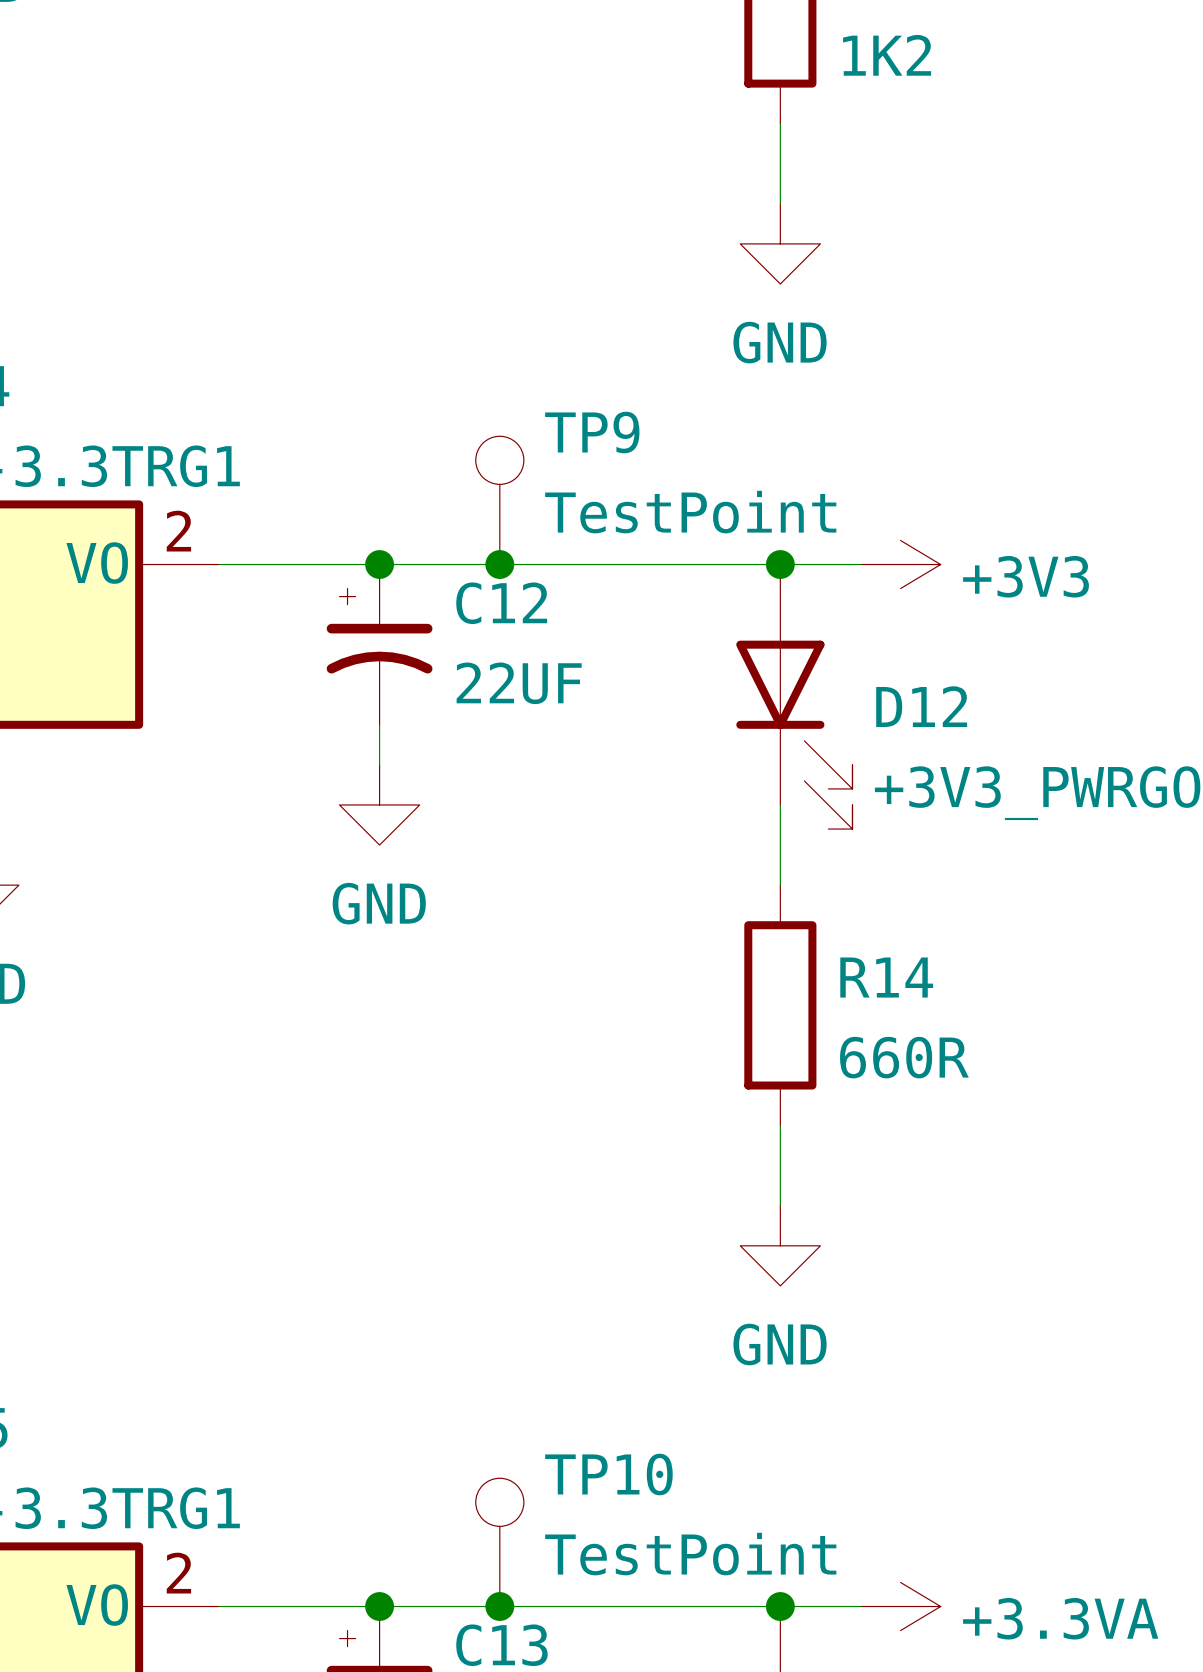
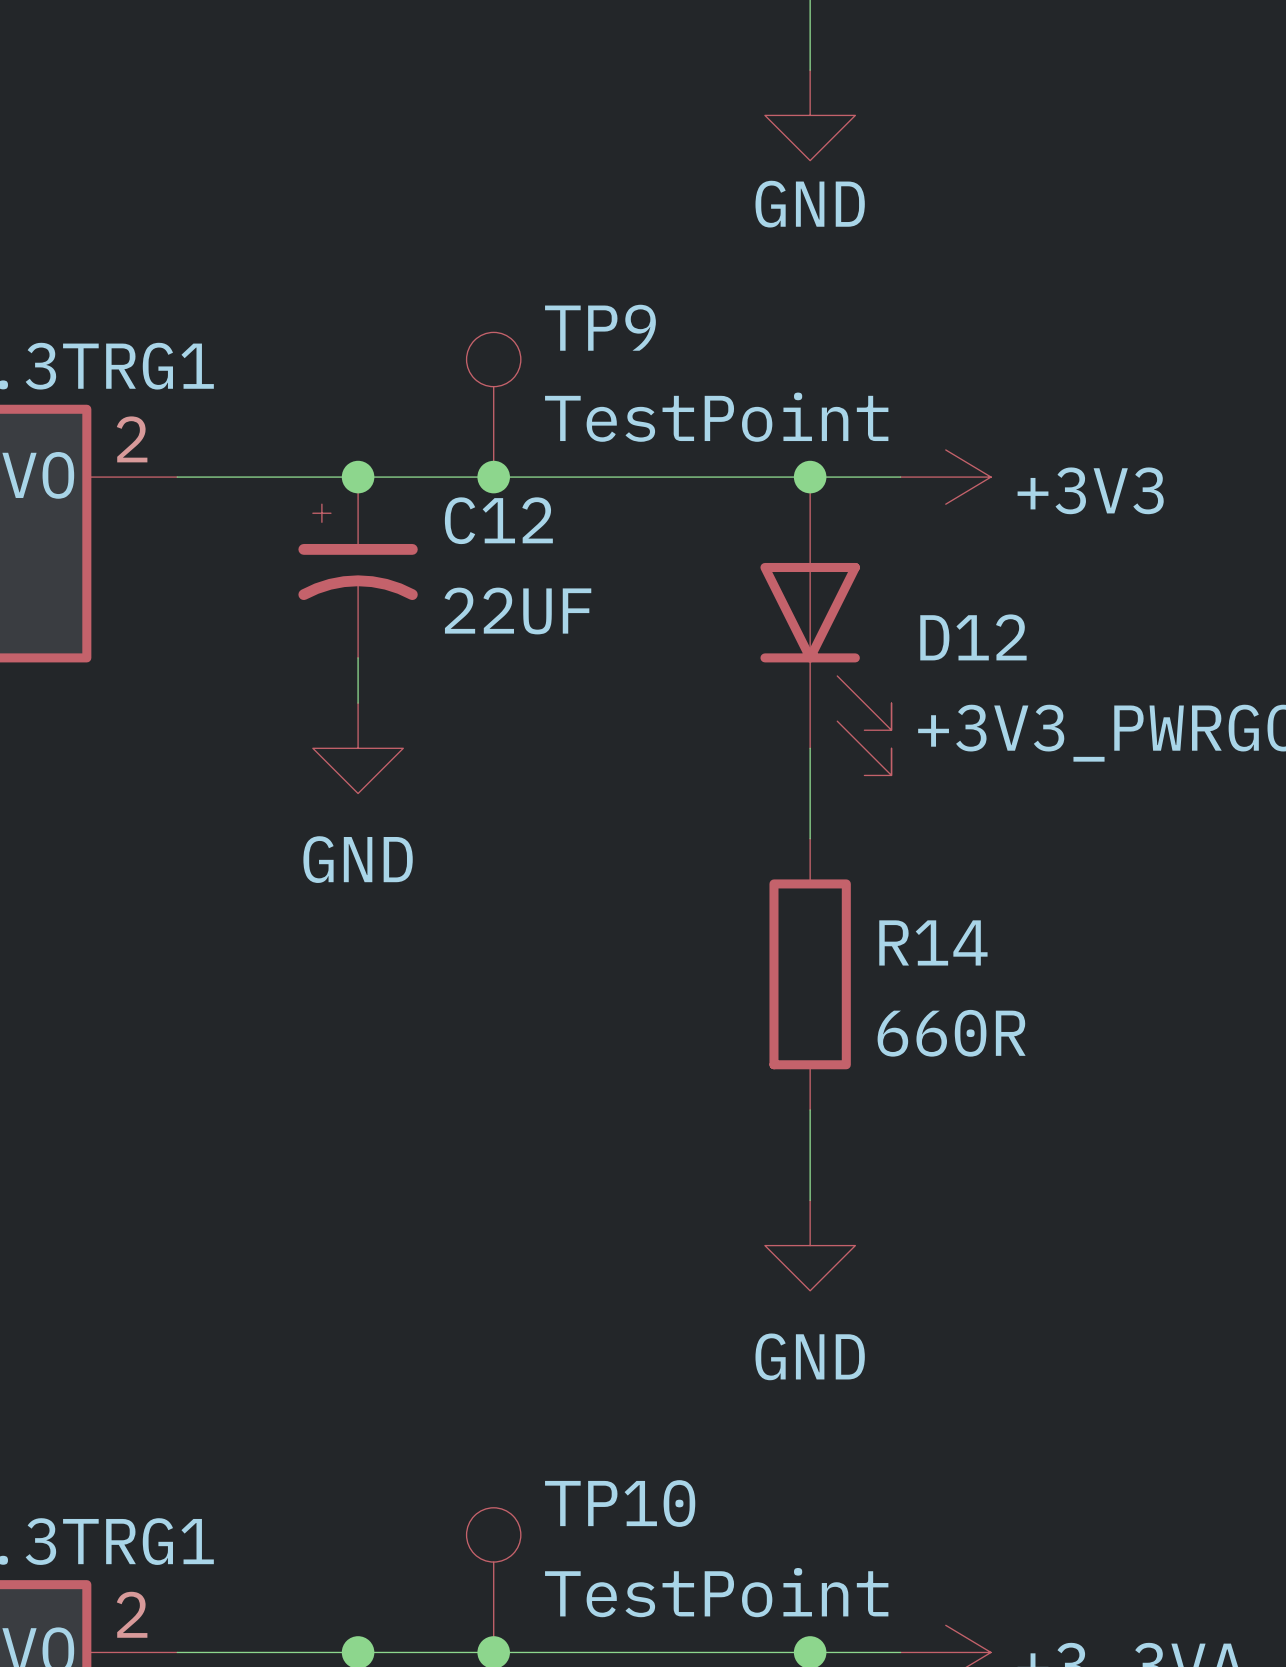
power symbol text position: GND (780, 342) -> GND (810, 204)

